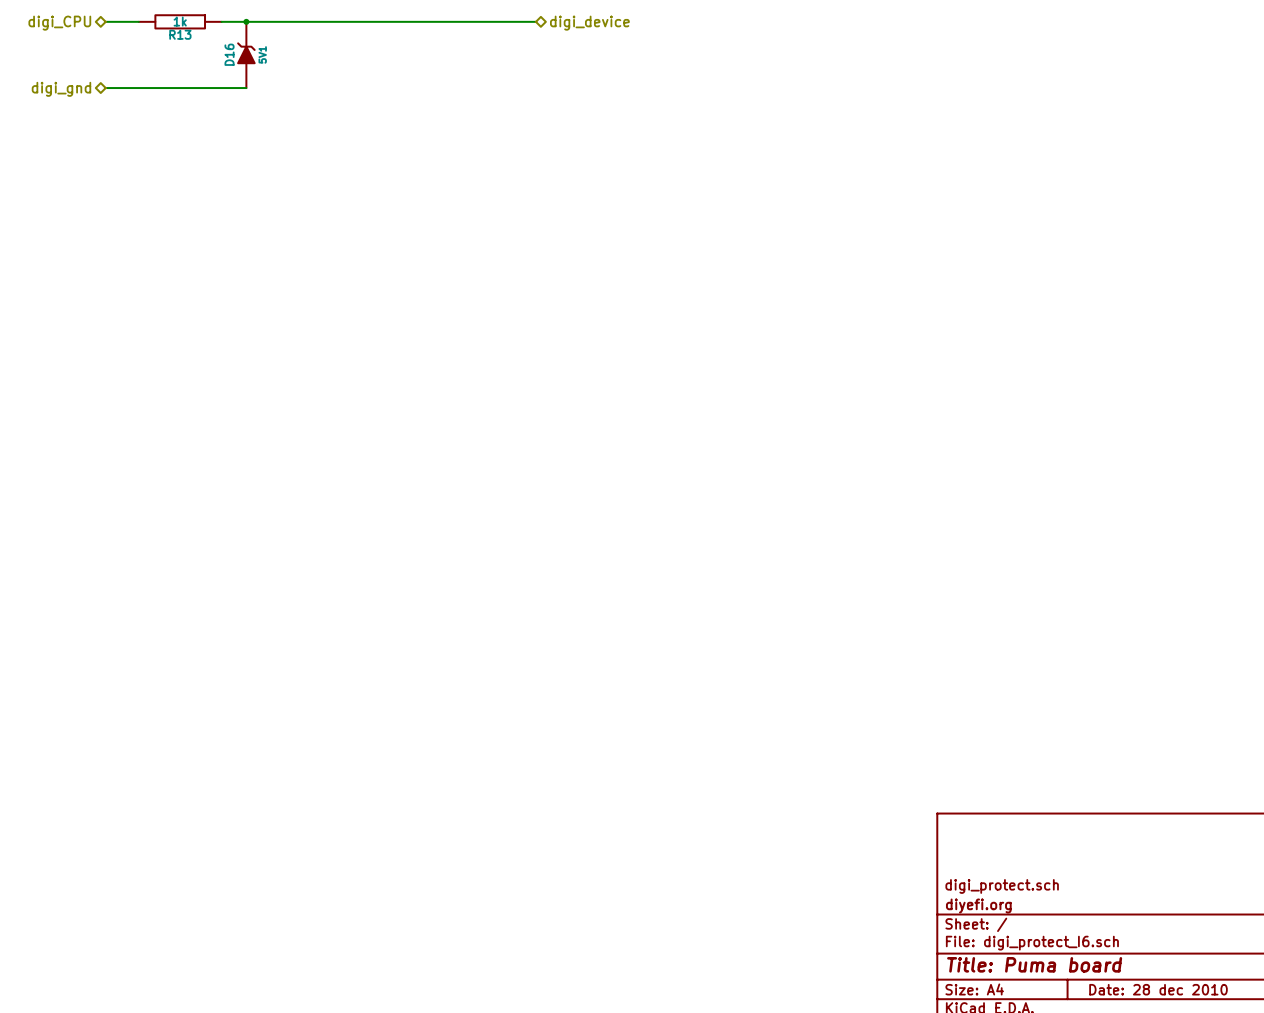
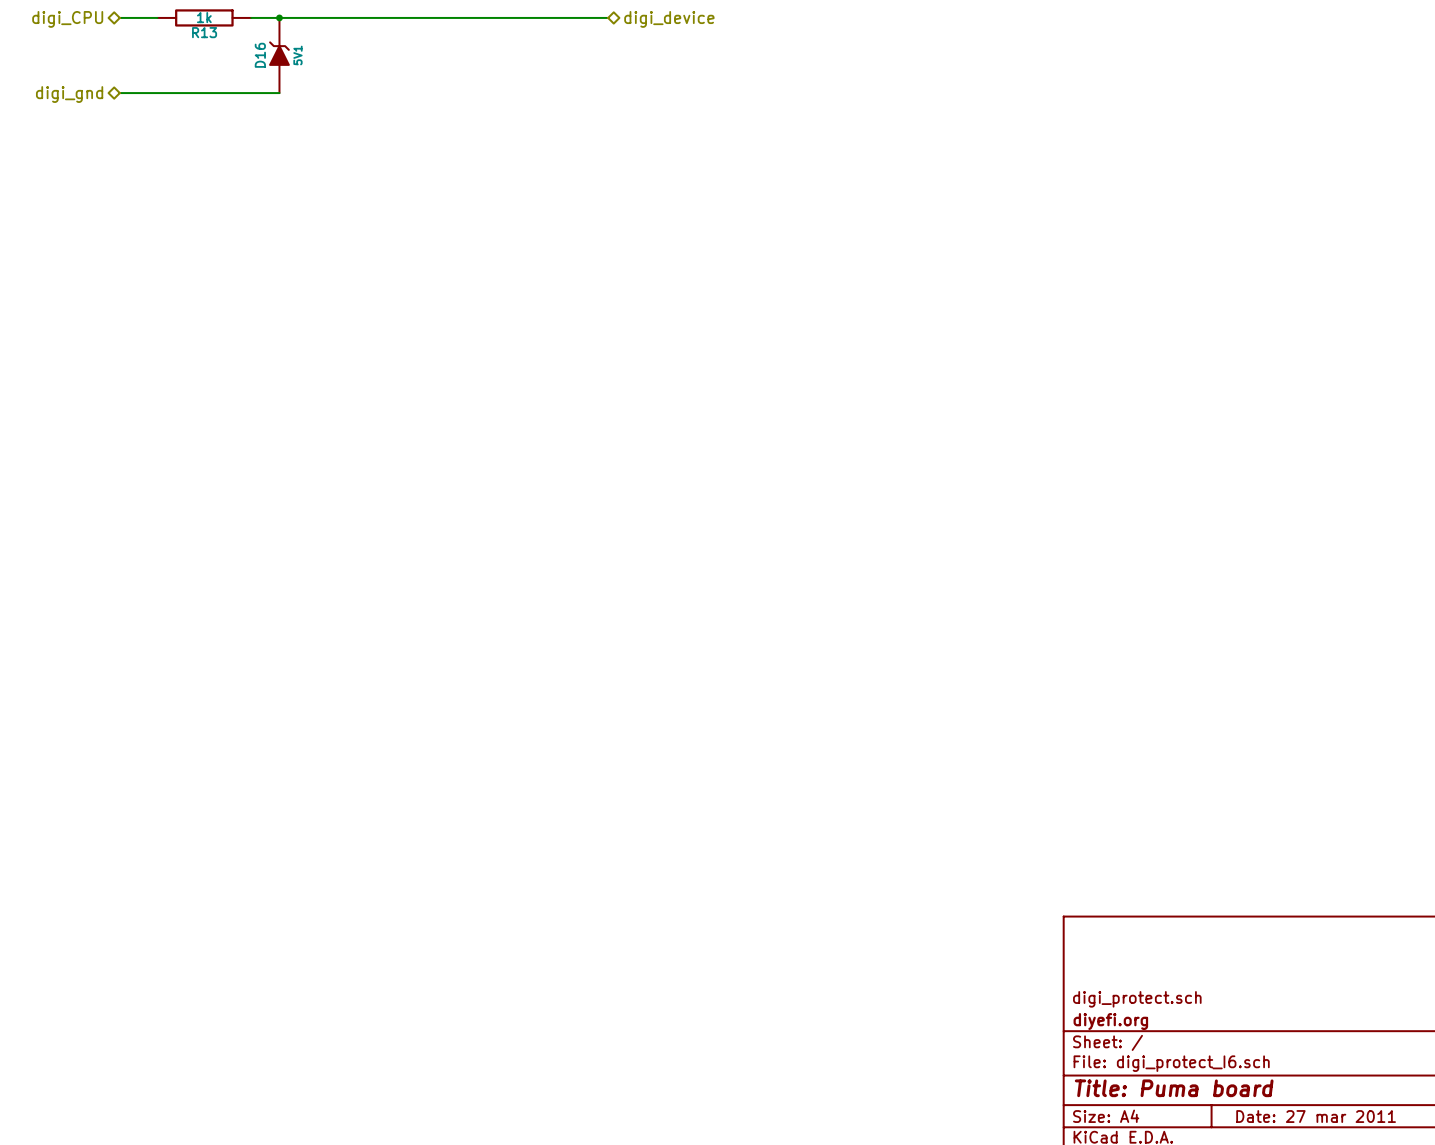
title block: Date: 28 dec 2010 (1158, 989) -> Date: 27 mar 2011 (1316, 1116)

